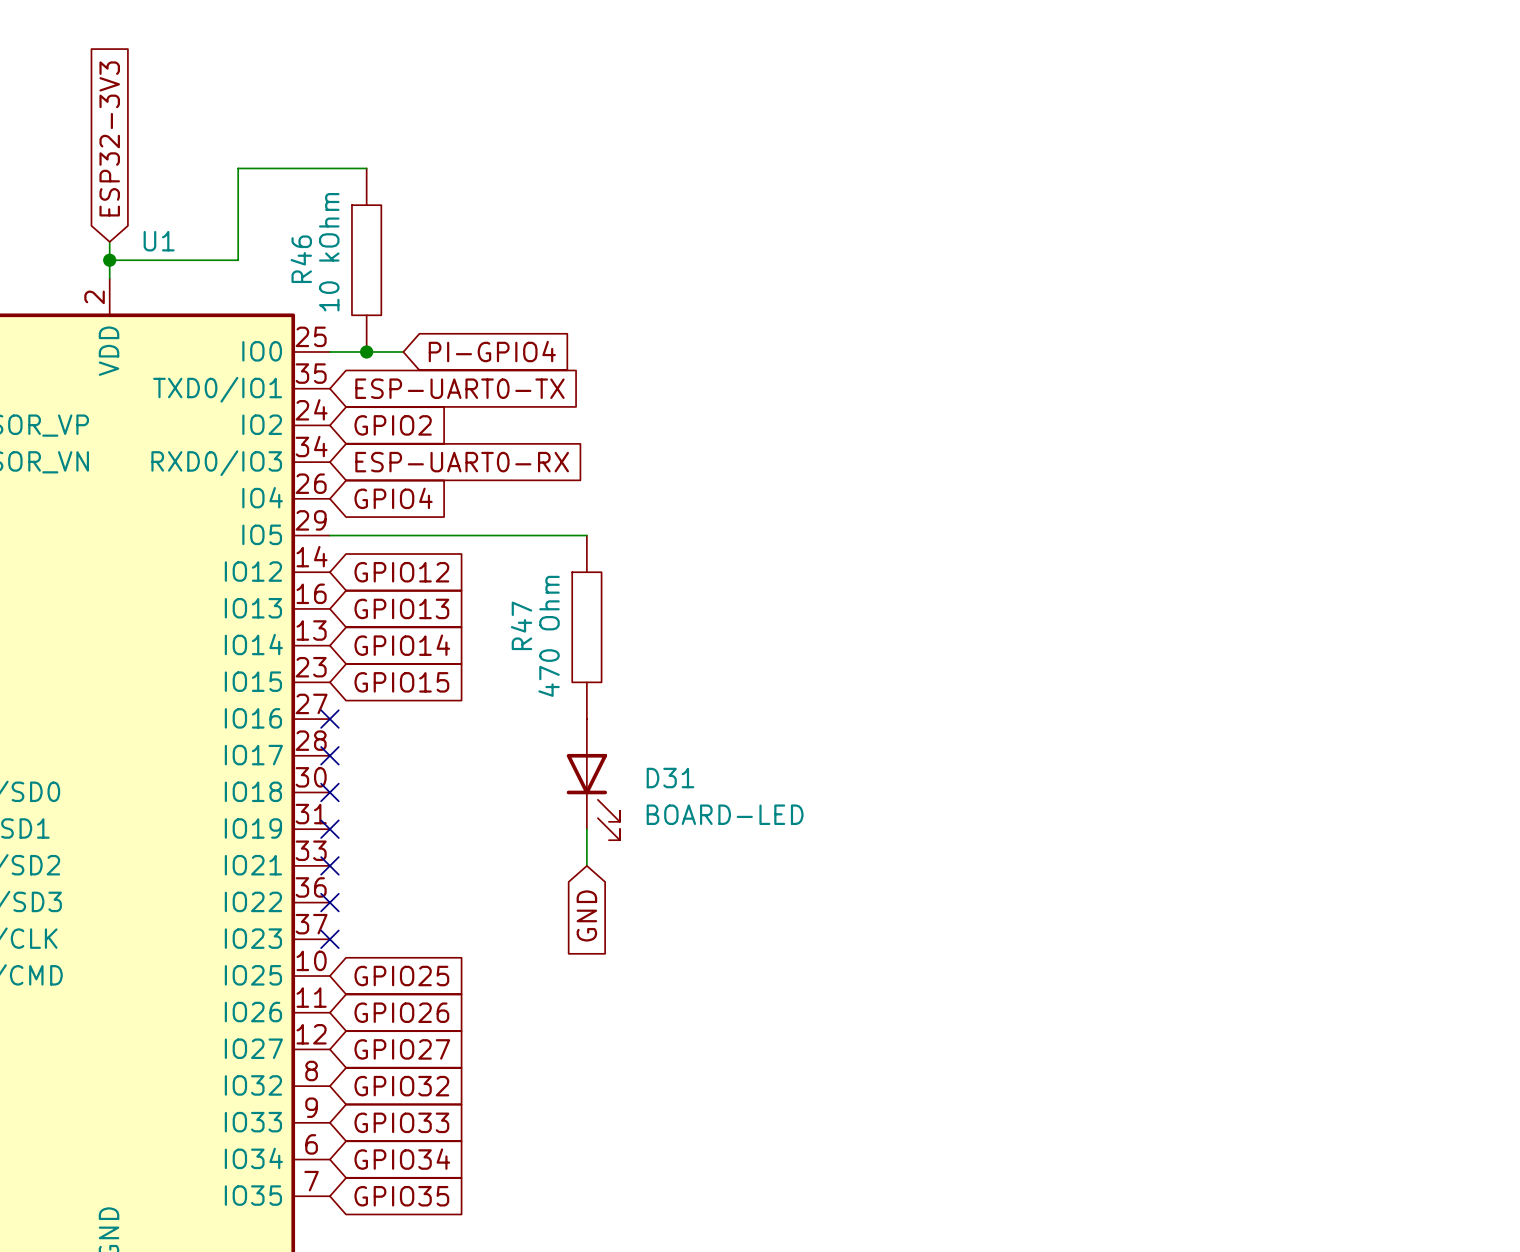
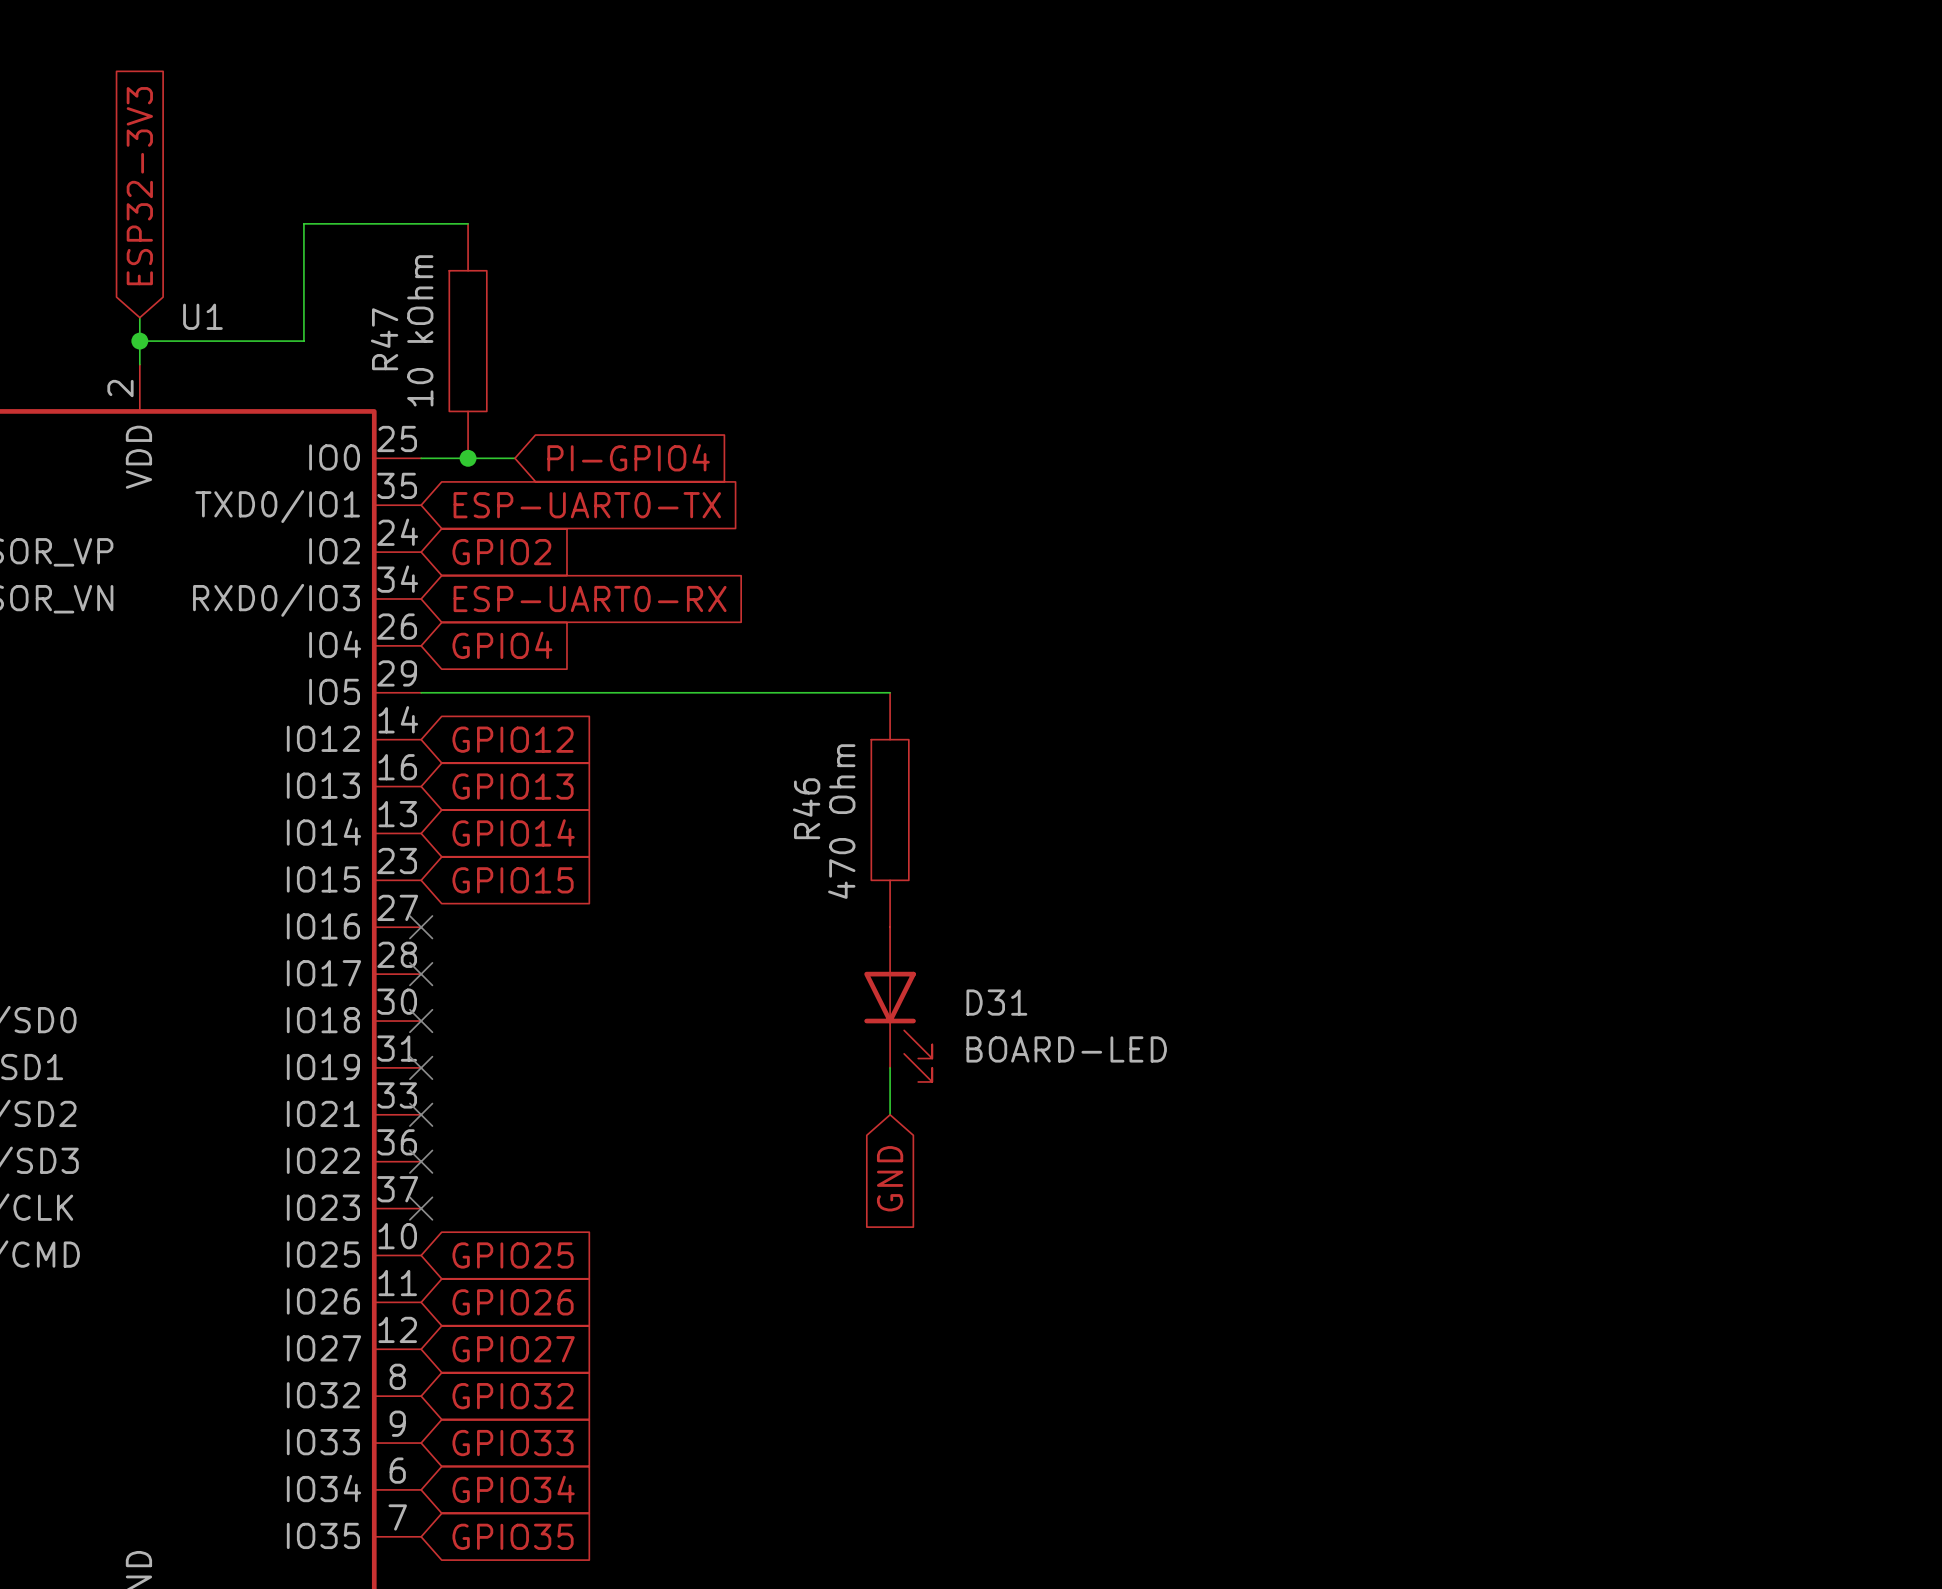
R46 name: R46 (301, 259) -> R47 (384, 339)
wire: none -> (749, 692) (890, 692)
R47: 470 Ohm (586, 627) -> none
R46: none -> 470 Ohm (890, 810)
D31 position: (593, 779) -> (898, 1004)
wire: (586, 829) (586, 865) -> (890, 1067) (890, 1114)
global label position: GND (586, 915) -> GND (890, 1178)

